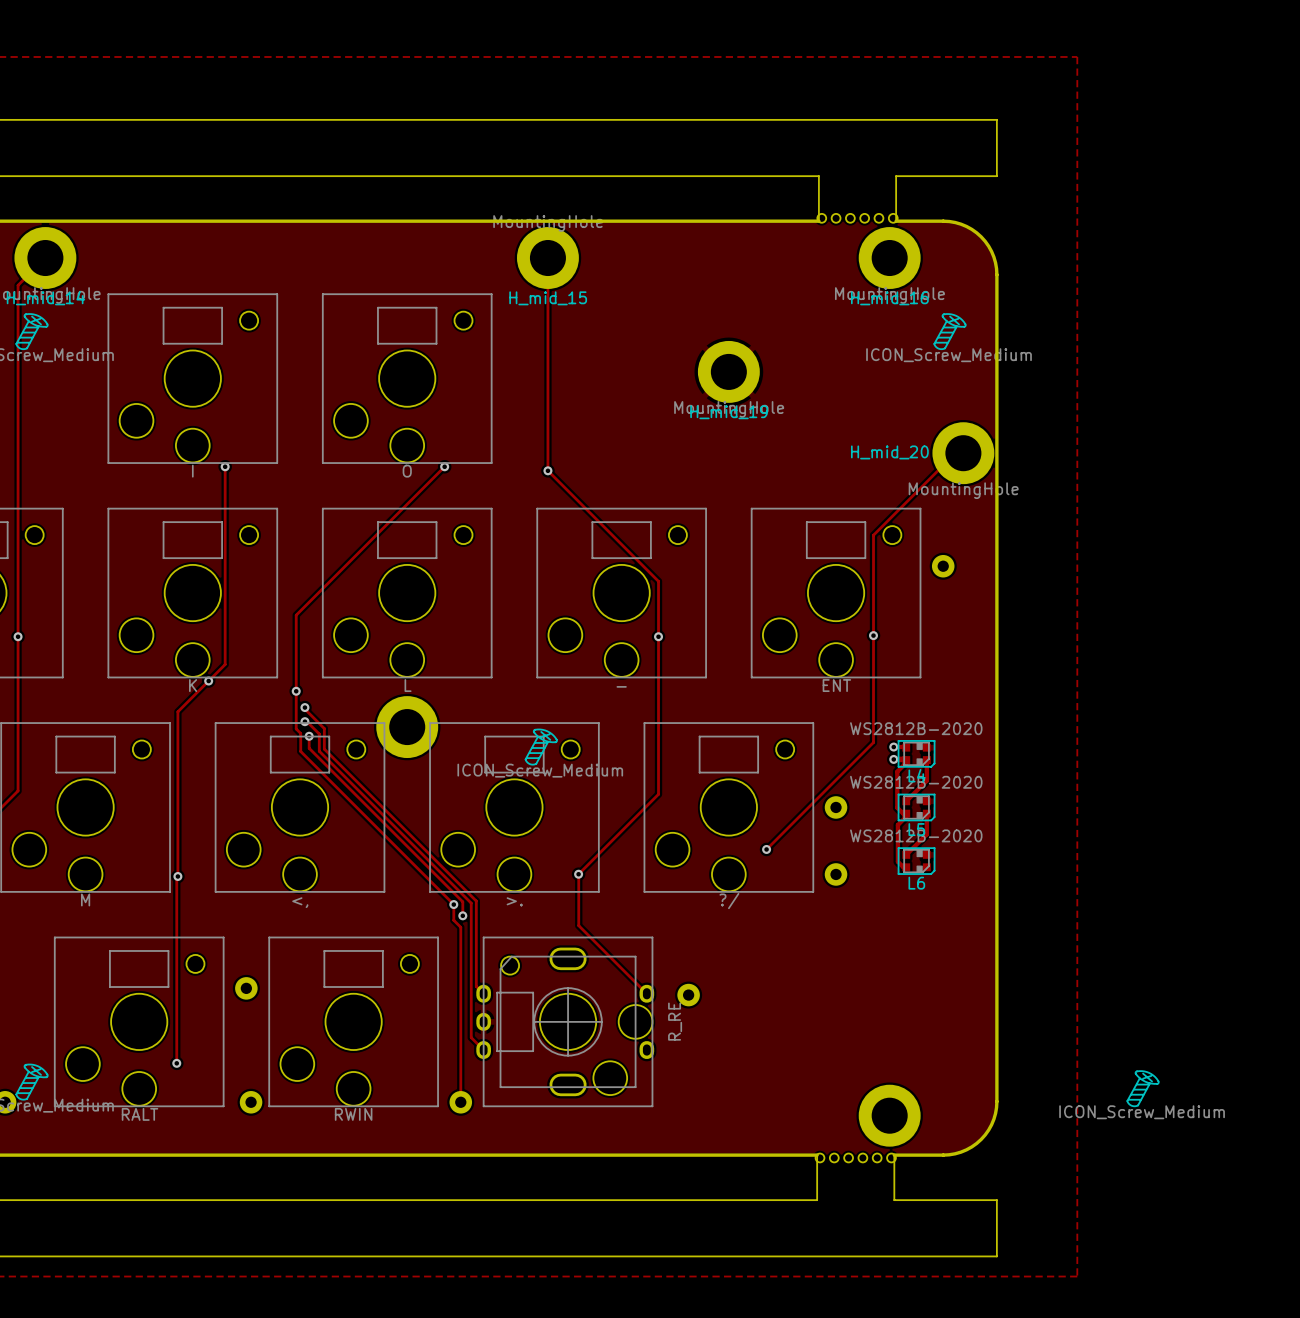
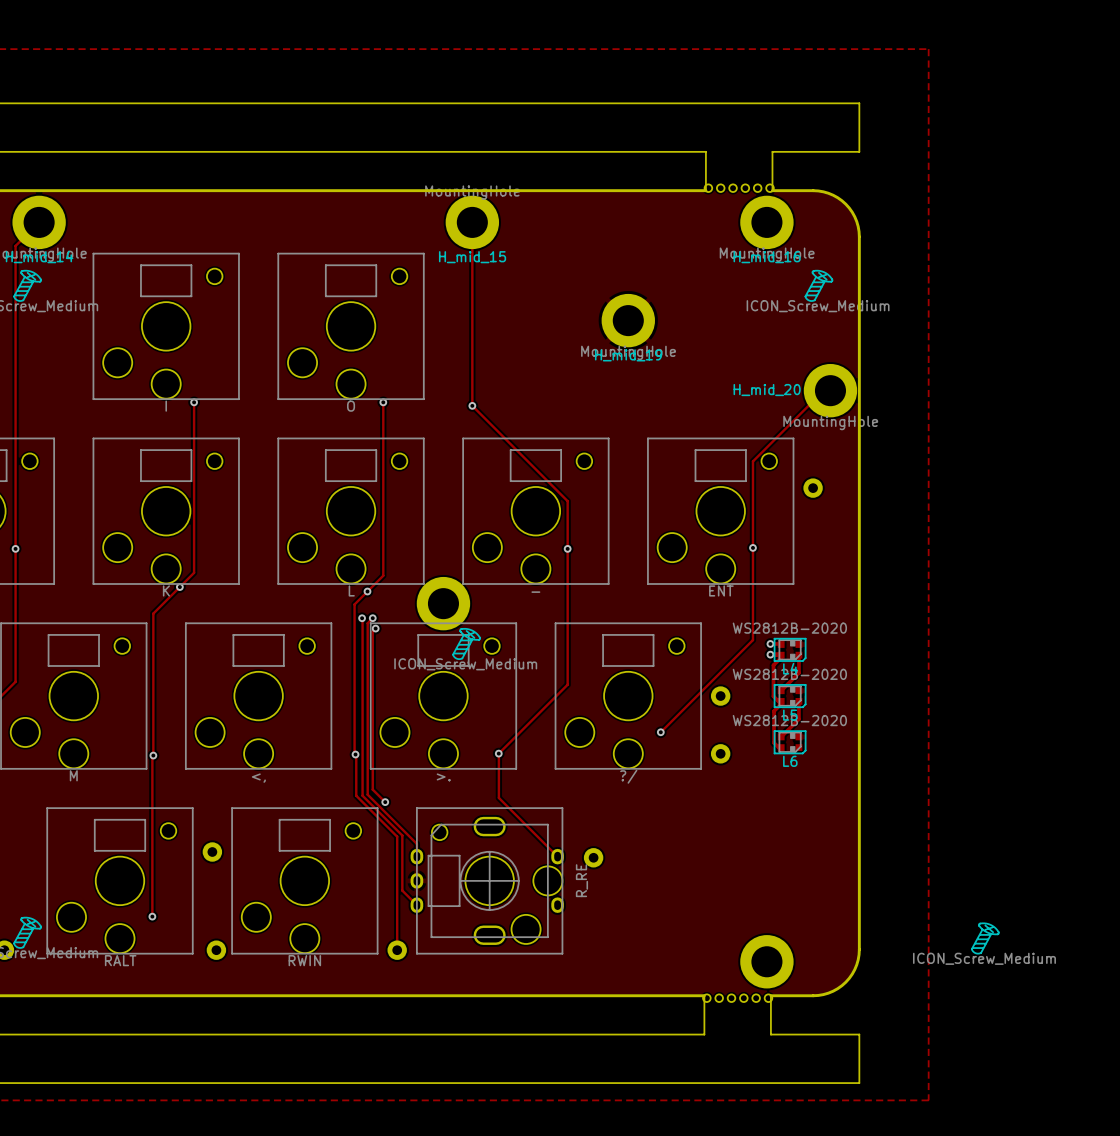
track: (444, 466) (296, 615) (296, 728) (300, 733) (300, 751) (453, 904) (453, 920) (460, 927) (460, 970) -> (383, 402) (383, 575) (354, 604) (354, 753) (356, 755) (356, 795) (397, 836)
via: none -> (367, 591)
via: (296, 691) -> none
track: (304, 707) (324, 728) (324, 749) (476, 901) (476, 986) (483, 993) -> (372, 618) (367, 623) (367, 794) (416, 843) (416, 856)
via: (304, 707) -> none
via: none -> (362, 618)
via: none -> (372, 618)
track: (304, 721) (319, 734) (319, 751) (471, 903) (471, 1037) -> (362, 618) (362, 795) (402, 835) (402, 890) (406, 894)
via: (304, 721) -> none
part position: (407, 727) -> (443, 603)
track: none -> (375, 628) (372, 631) (372, 789) (385, 802)
via: none -> (375, 628)
track: (309, 736) (309, 748) (462, 901) (462, 915) -> none
via: (309, 736) -> none
via: none -> (355, 754)
via: (453, 904) -> none
via: (462, 915) -> none
via: none -> (385, 802)

